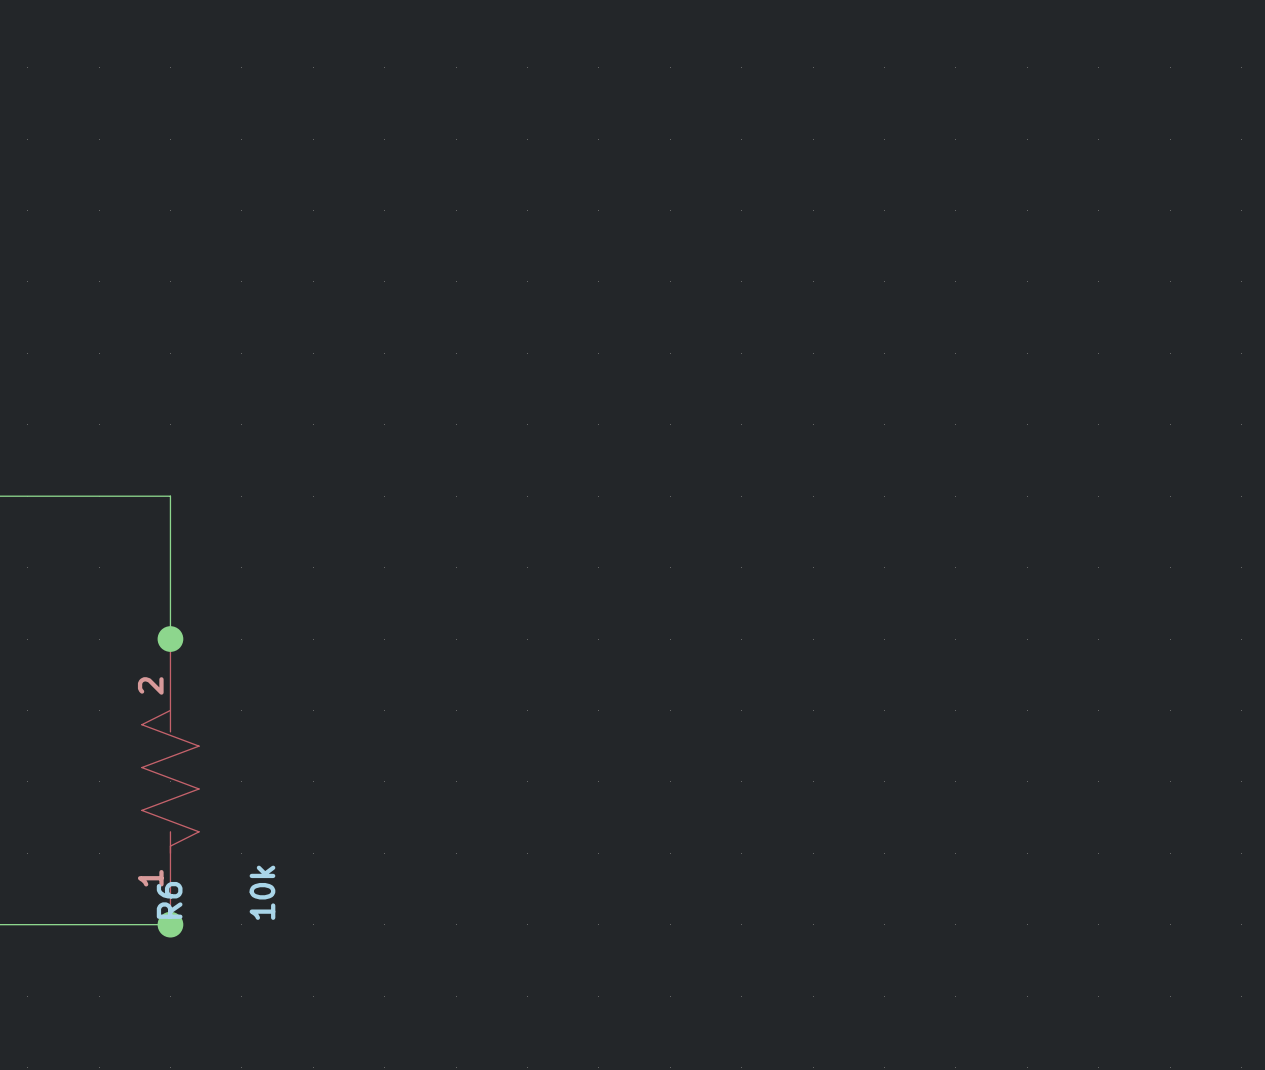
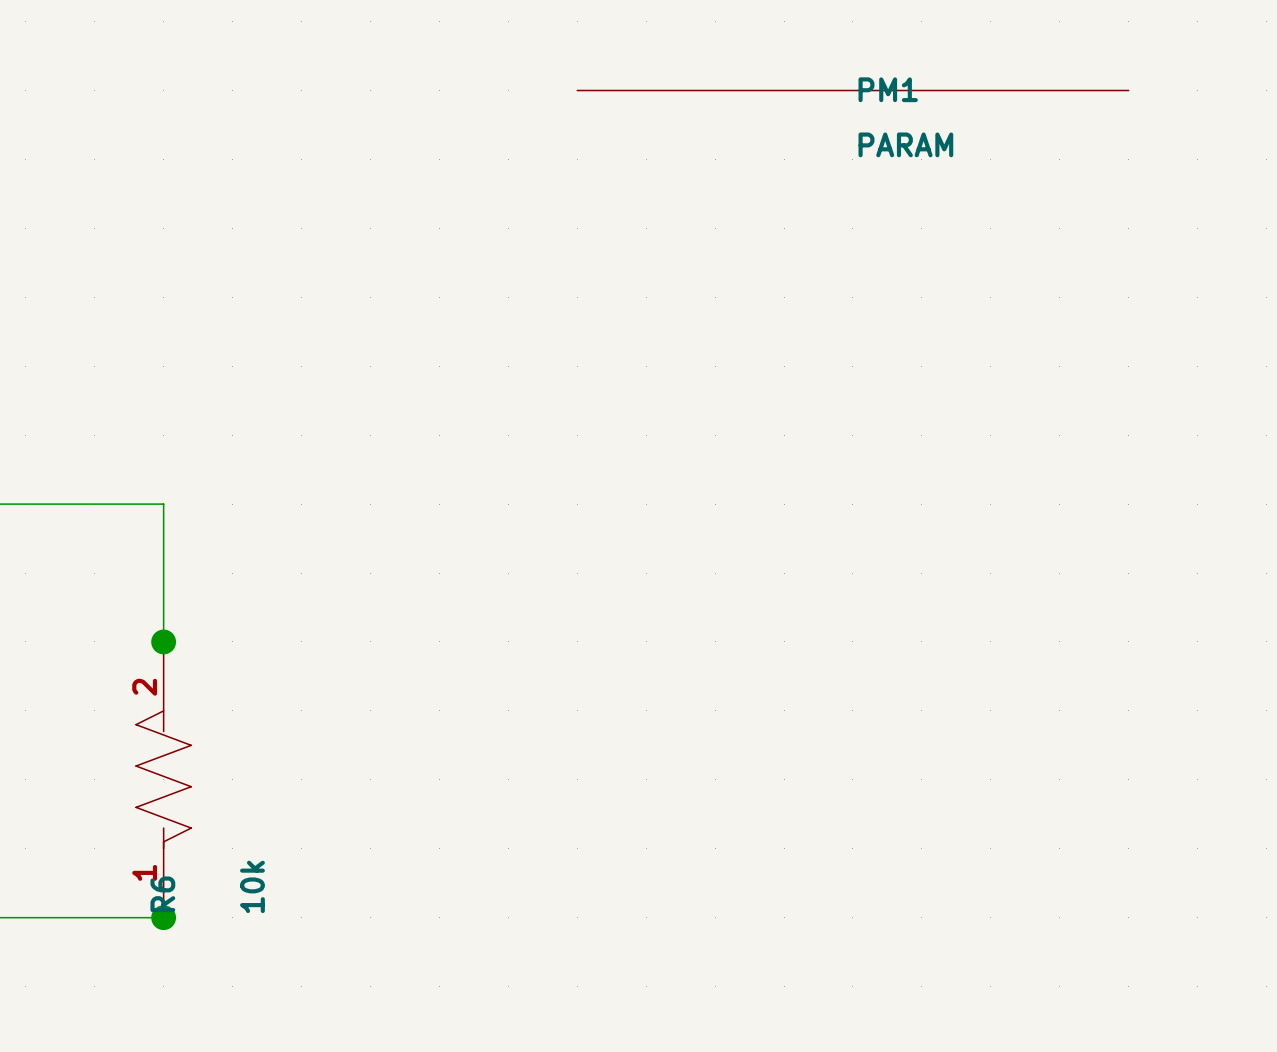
PM1: none -> PARAM (852, 90)

